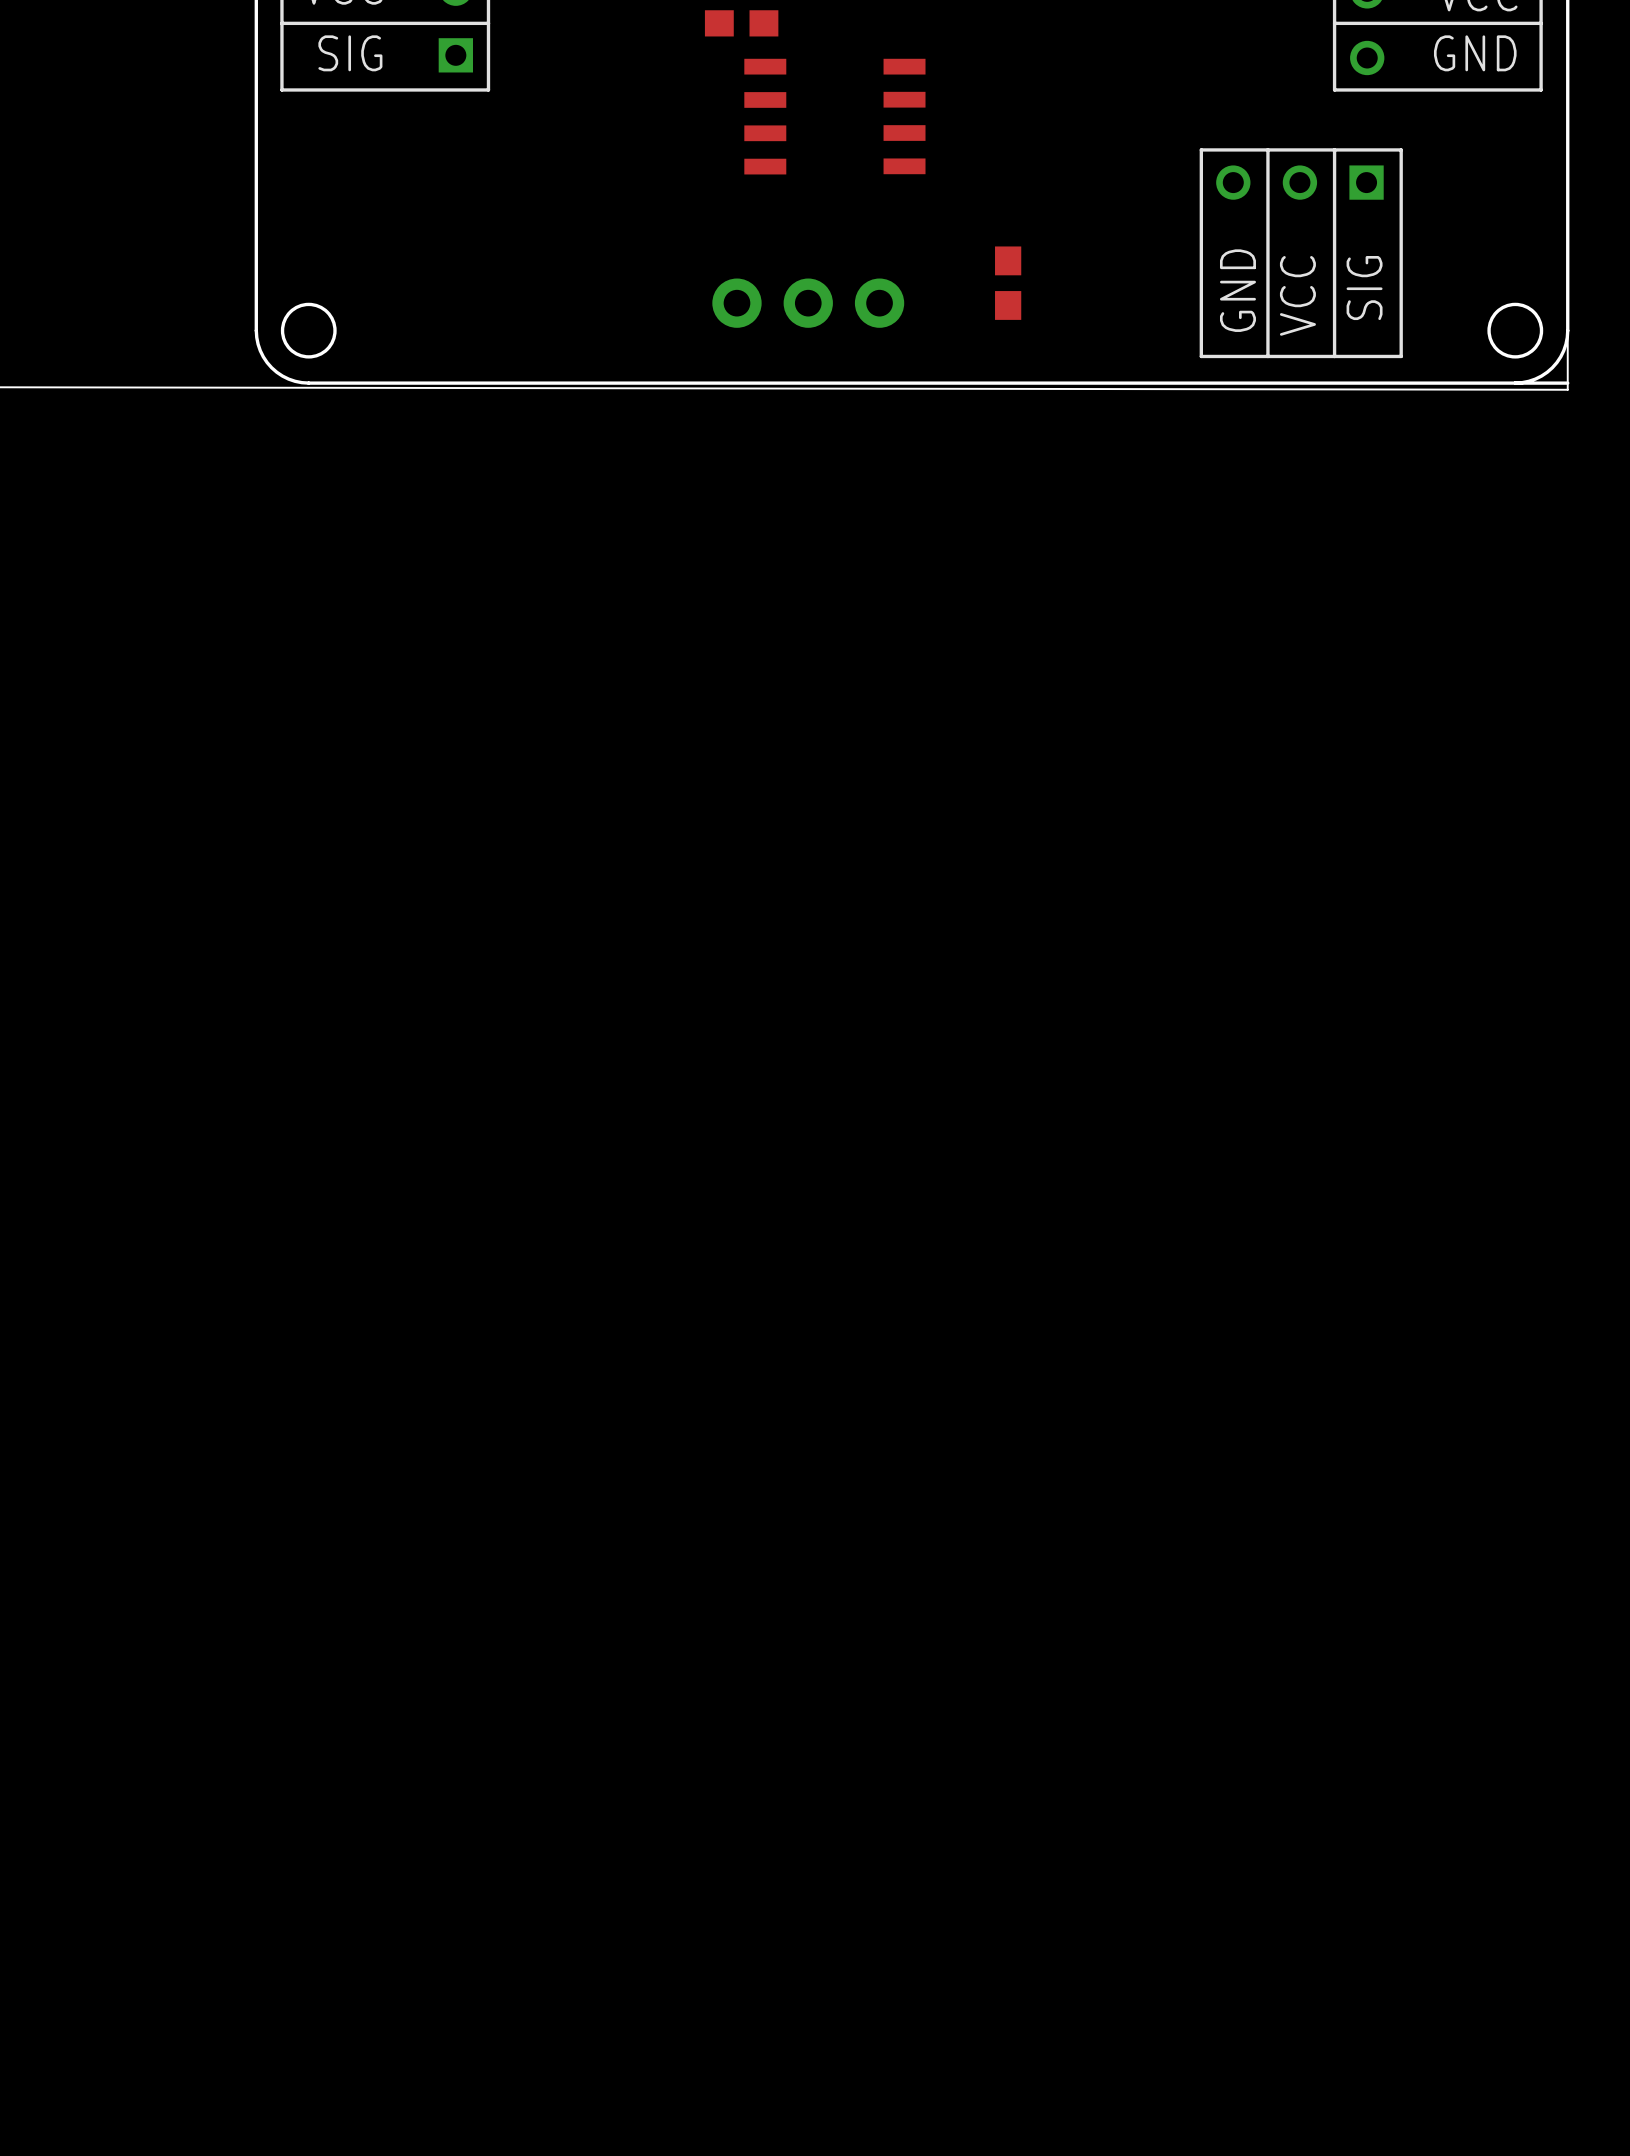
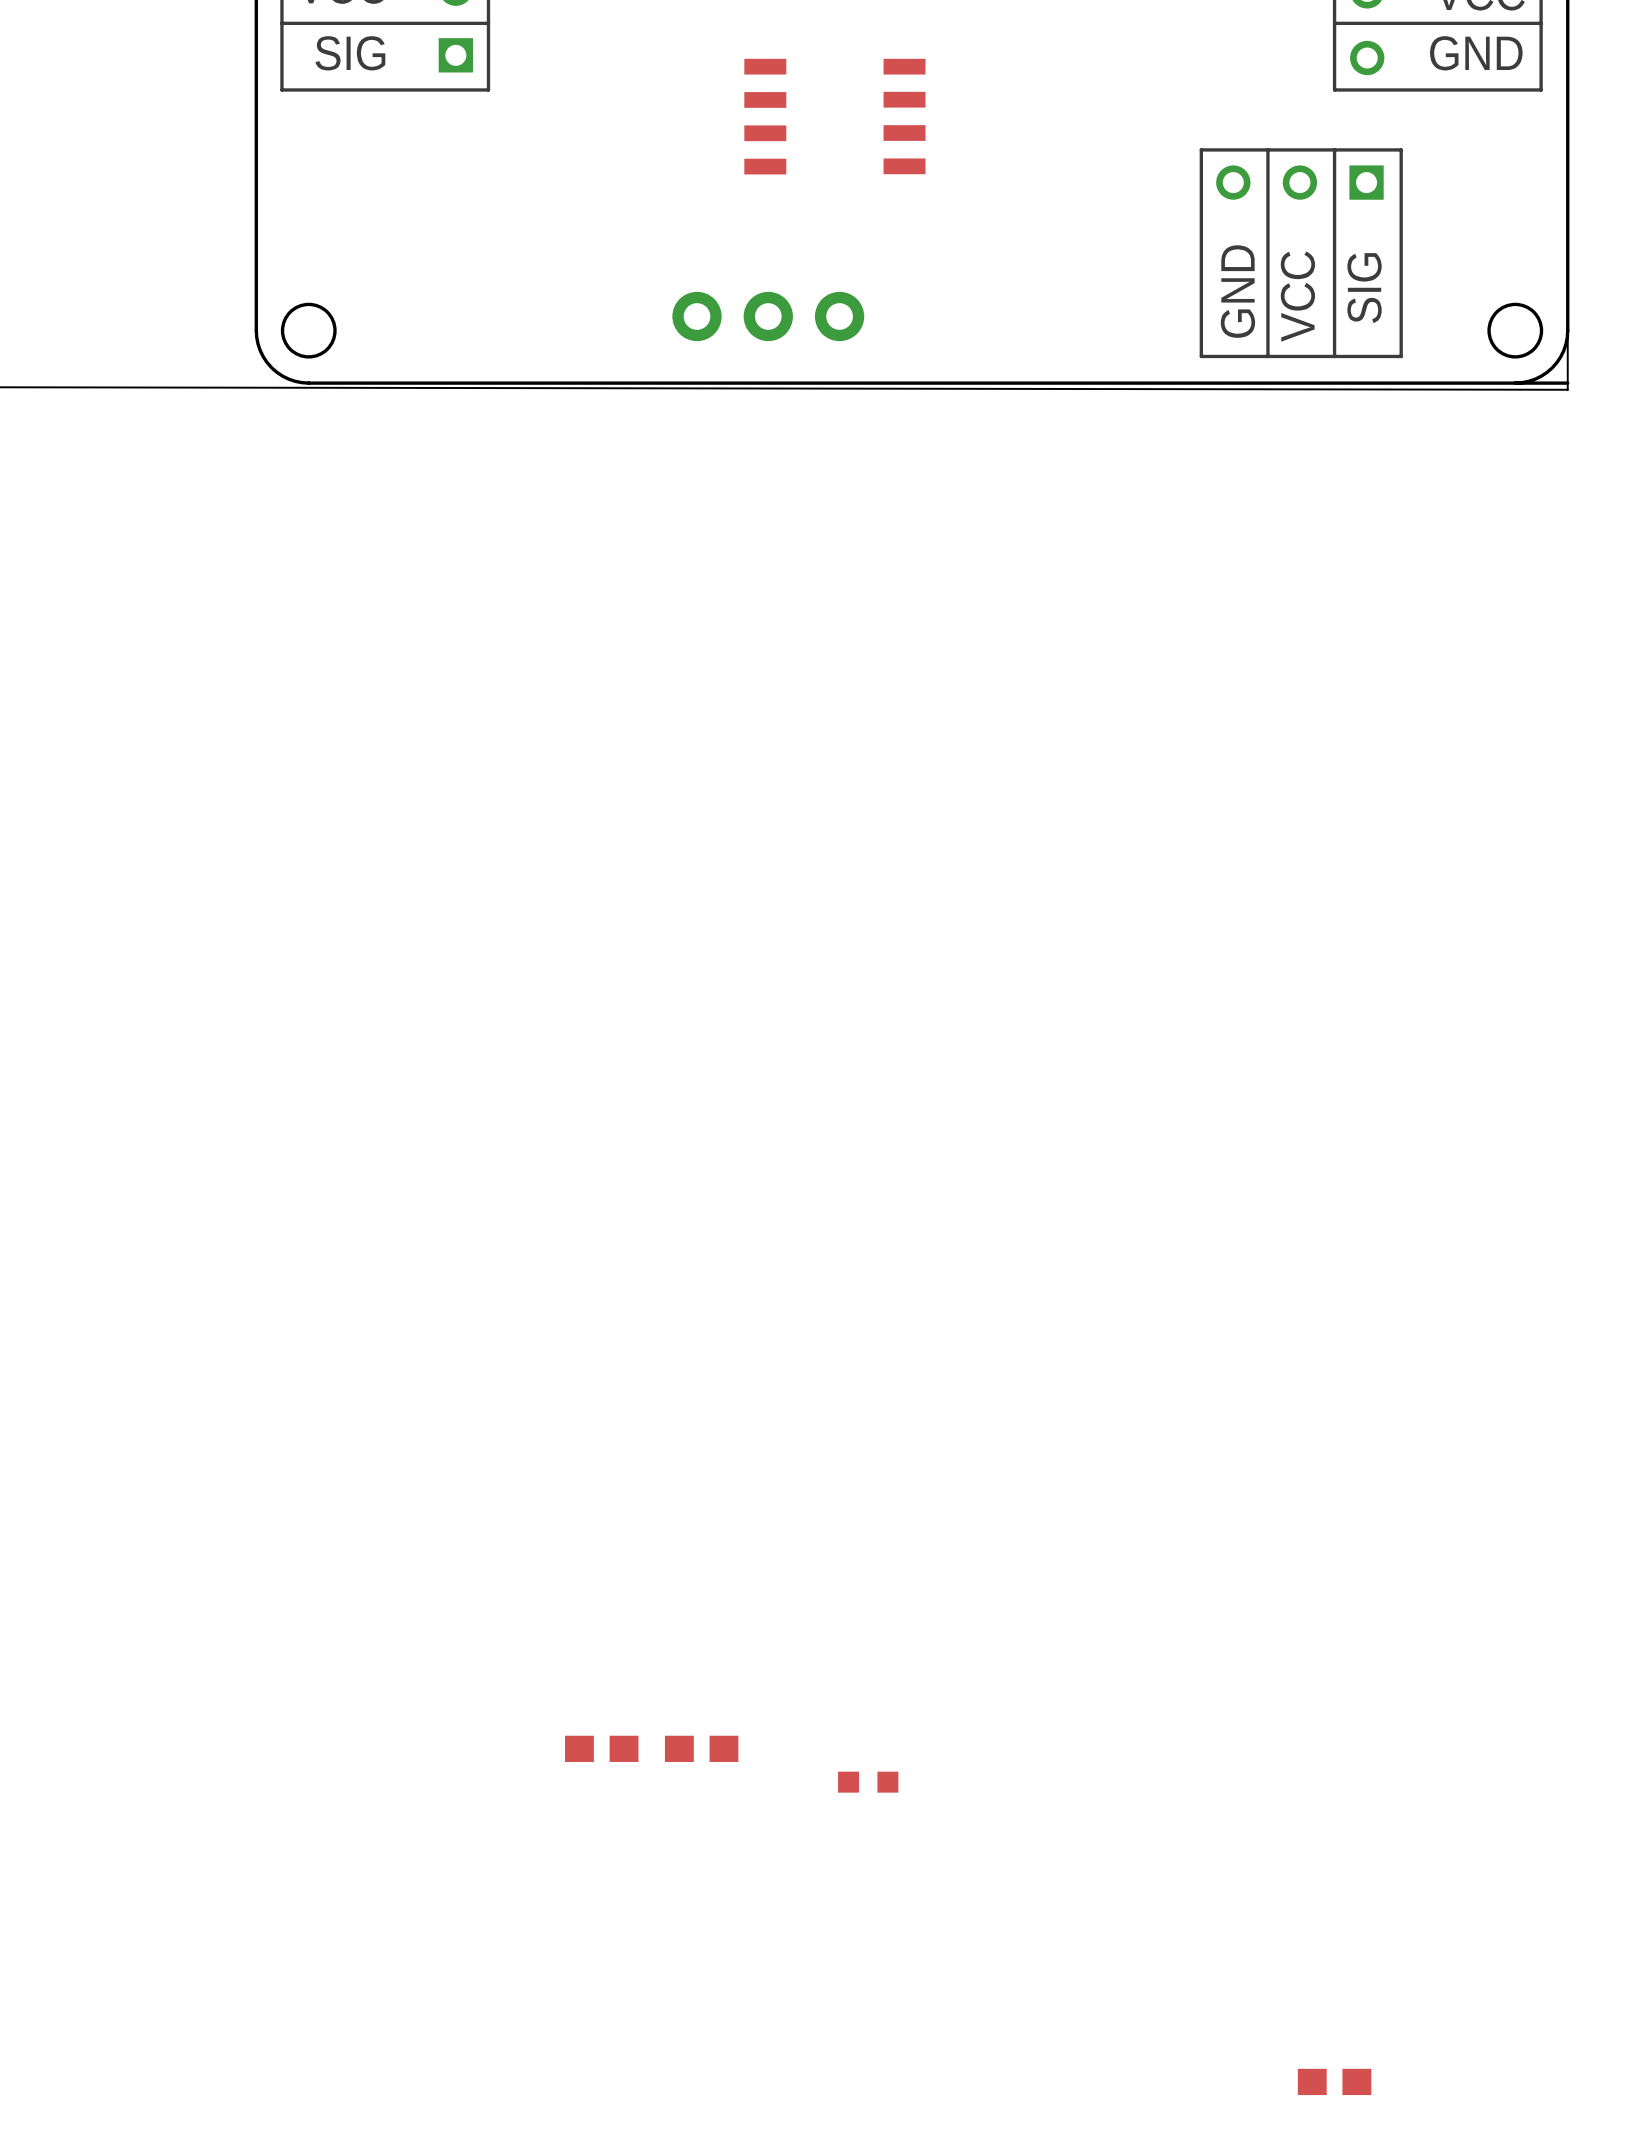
part: (741, 23) -> none
part: (1008, 283) -> none
part position: (808, 303) -> (768, 316)
part: none -> (601, 1748)
part: none -> (701, 1748)
part: none -> (868, 1782)
part: none -> (1334, 2081)

